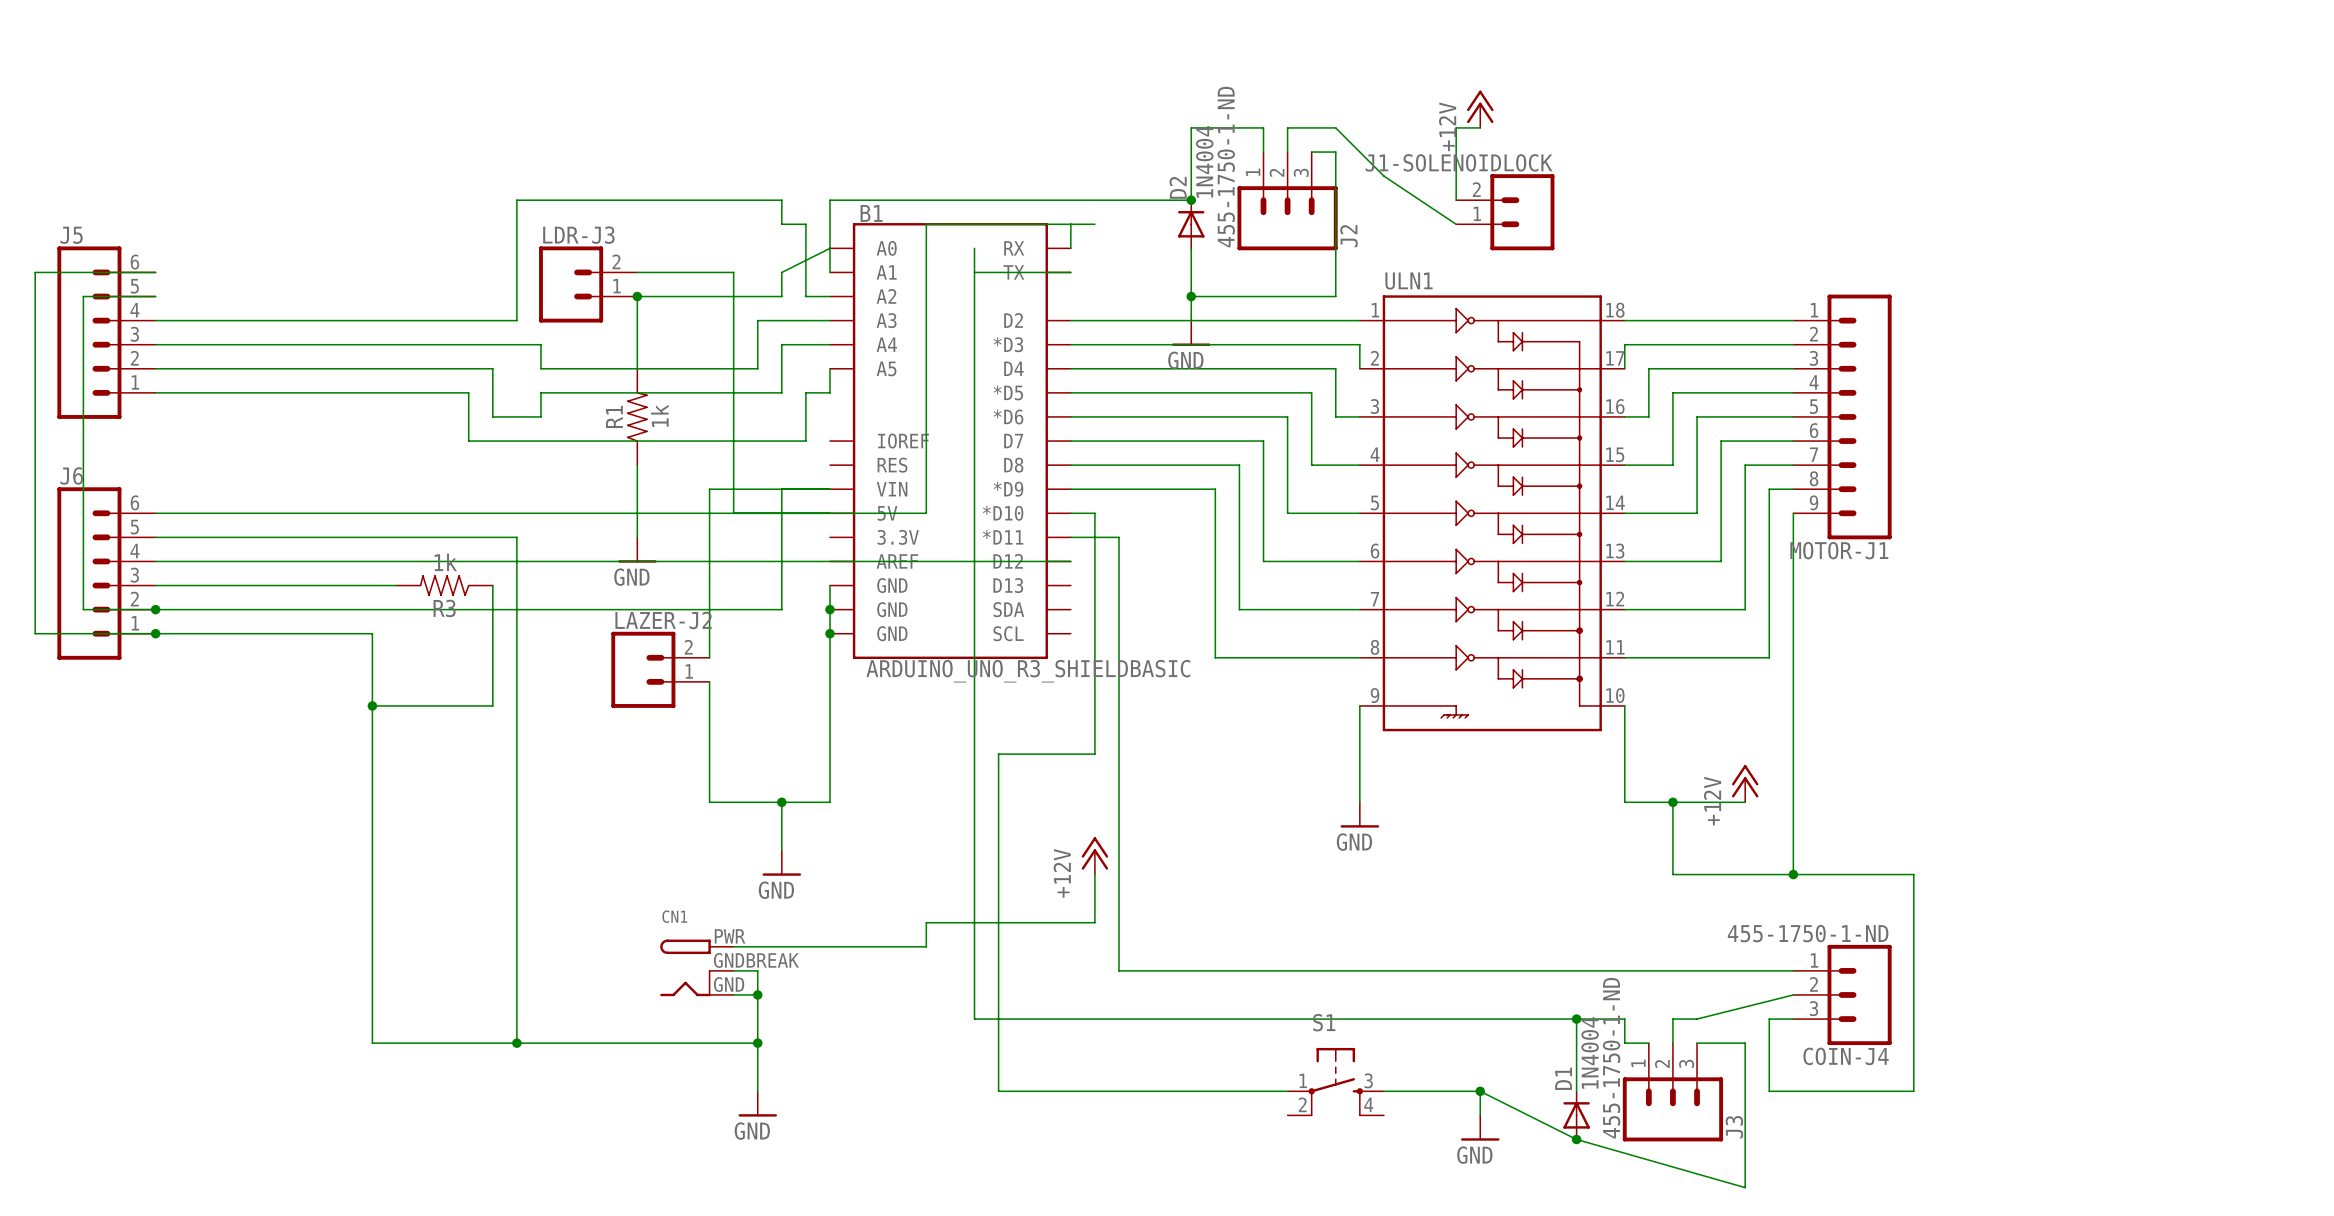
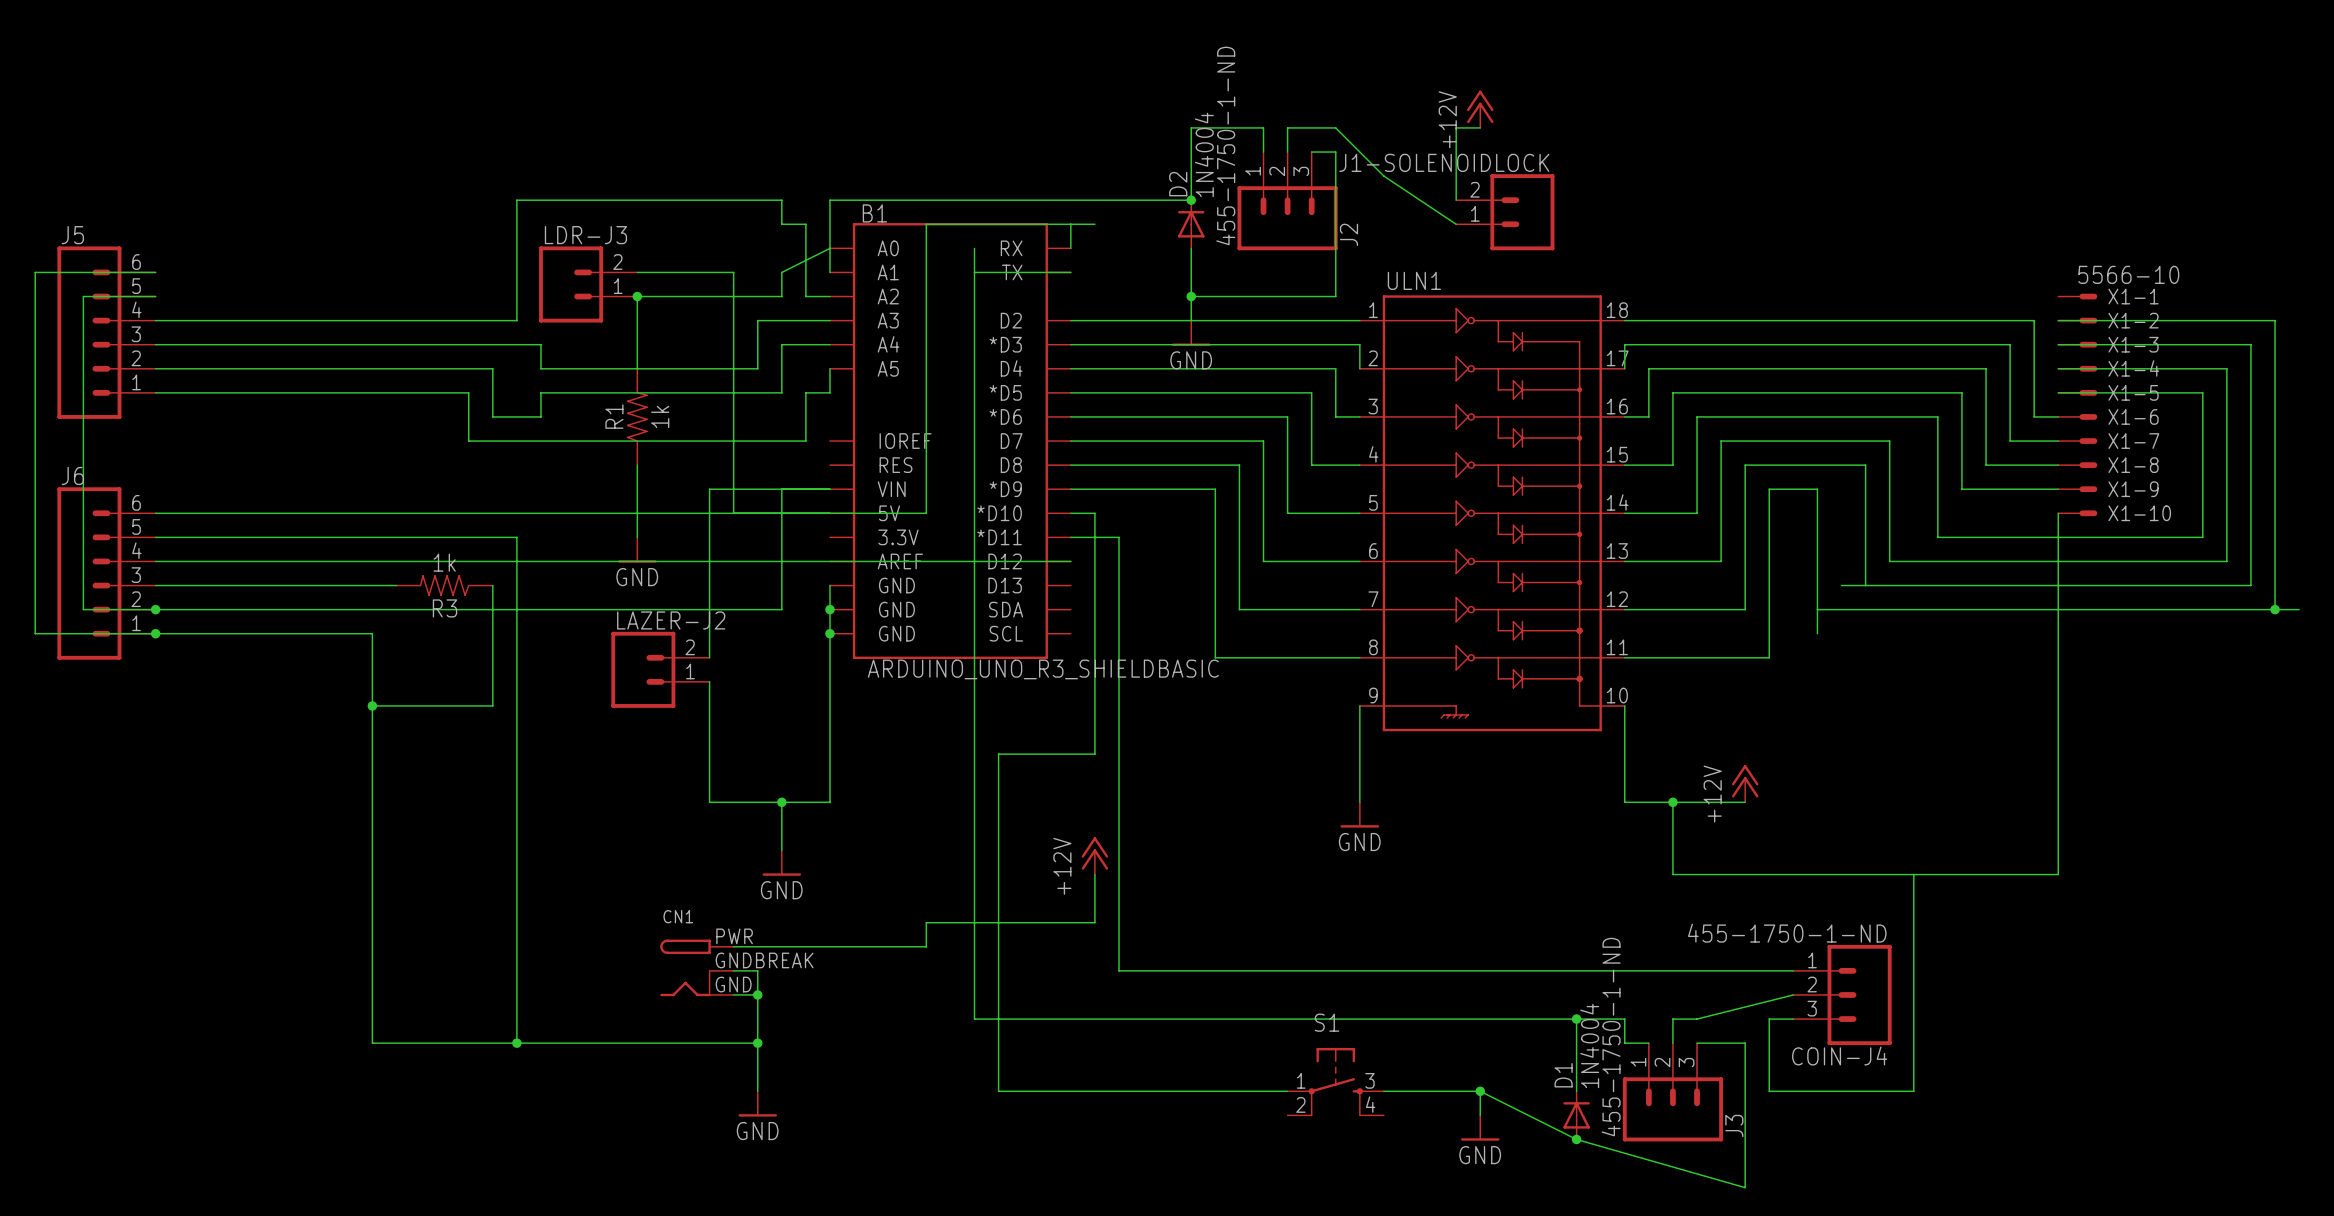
X1-1: none -> 5566-10 (2077, 296)
wire: none -> (1793, 320) (2034, 320) (2034, 416) (2058, 416)
wire: none -> (2058, 320) (2275, 320) (2275, 609)
X1-2: none -> (2077, 320)
wire: none -> (1793, 344) (2010, 344) (2010, 441) (2058, 441)
wire: none -> (2058, 344) (2250, 344) (2250, 585) (1841, 585)
X1-3: none -> (2077, 344)
wire: none -> (1793, 368) (1986, 368) (1986, 465) (2058, 465)
wire: none -> (2058, 368) (2226, 368) (2226, 561) (1889, 561) (1889, 441) (1793, 441)
X1-4: none -> (2077, 368)
wire: none -> (1793, 392) (1961, 392) (1961, 489) (2058, 489)
wire: none -> (2058, 392) (2202, 392) (2202, 537) (1937, 537) (1937, 416) (1793, 416)
X1-5: none -> (2077, 392)
MOTOR-J1: (1842, 416) -> none
X1-6: none -> (2077, 416)
X1-7: none -> (2077, 441)
wire: none -> (1793, 465) (1865, 465) (1865, 585)
X1-8: none -> (2077, 465)
wire: none -> (1793, 489) (1817, 489) (1817, 633)
X1-9: none -> (2077, 489)
wire: (1793, 513) (1793, 874) -> none
wire: none -> (2058, 513) (2058, 874) (1913, 874)
X1-10: none -> (2077, 513)
wire: none -> (1817, 609) (2299, 609)
junction: none -> (2275, 609)
junction: (1793, 874) -> none

